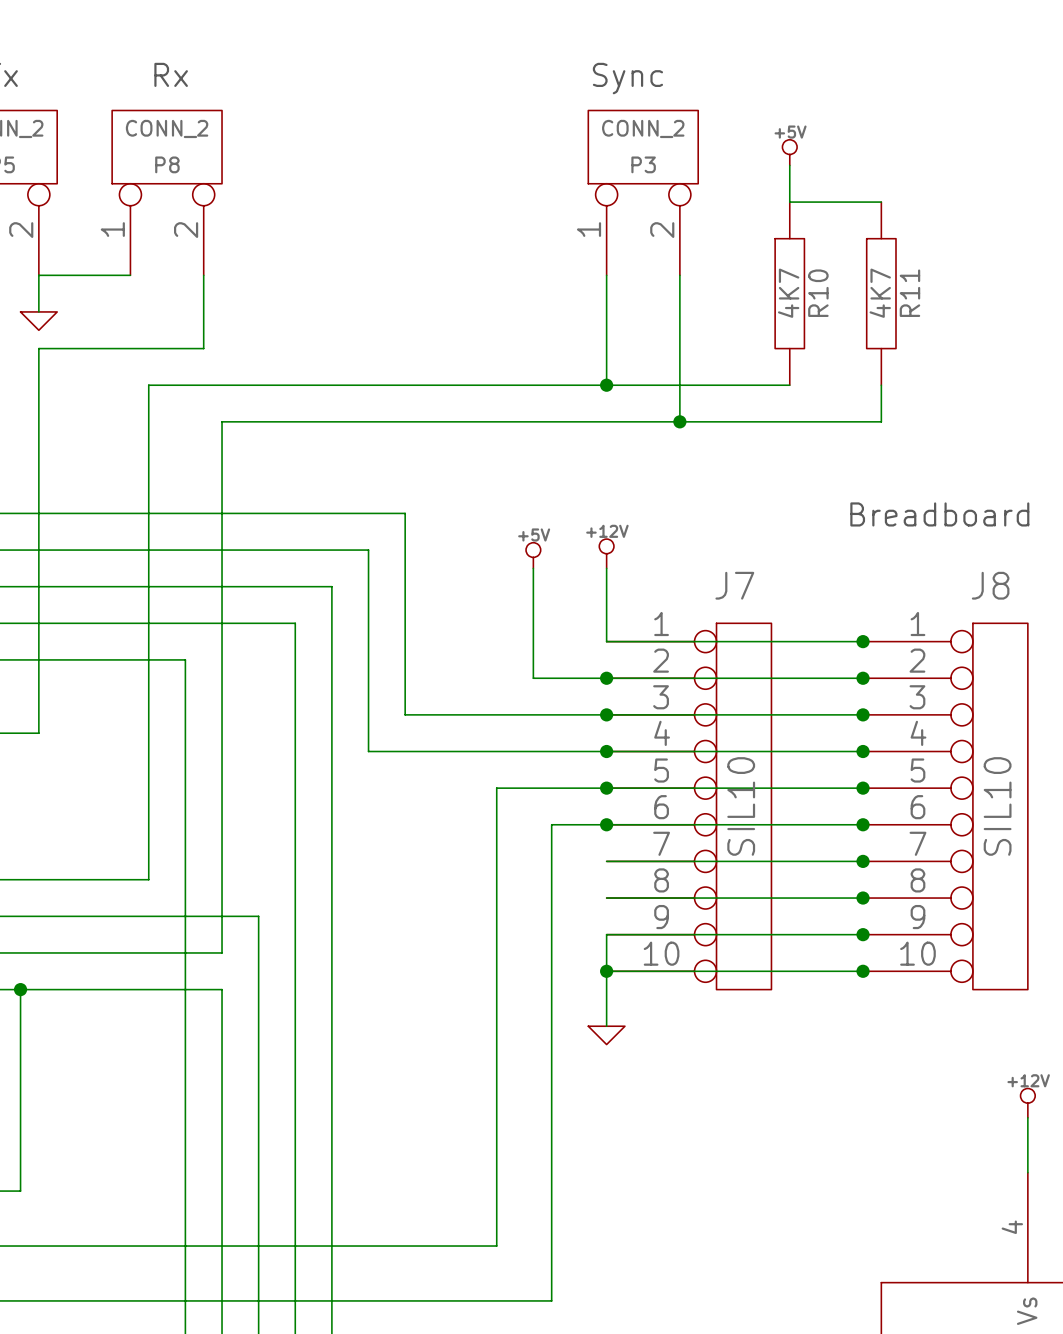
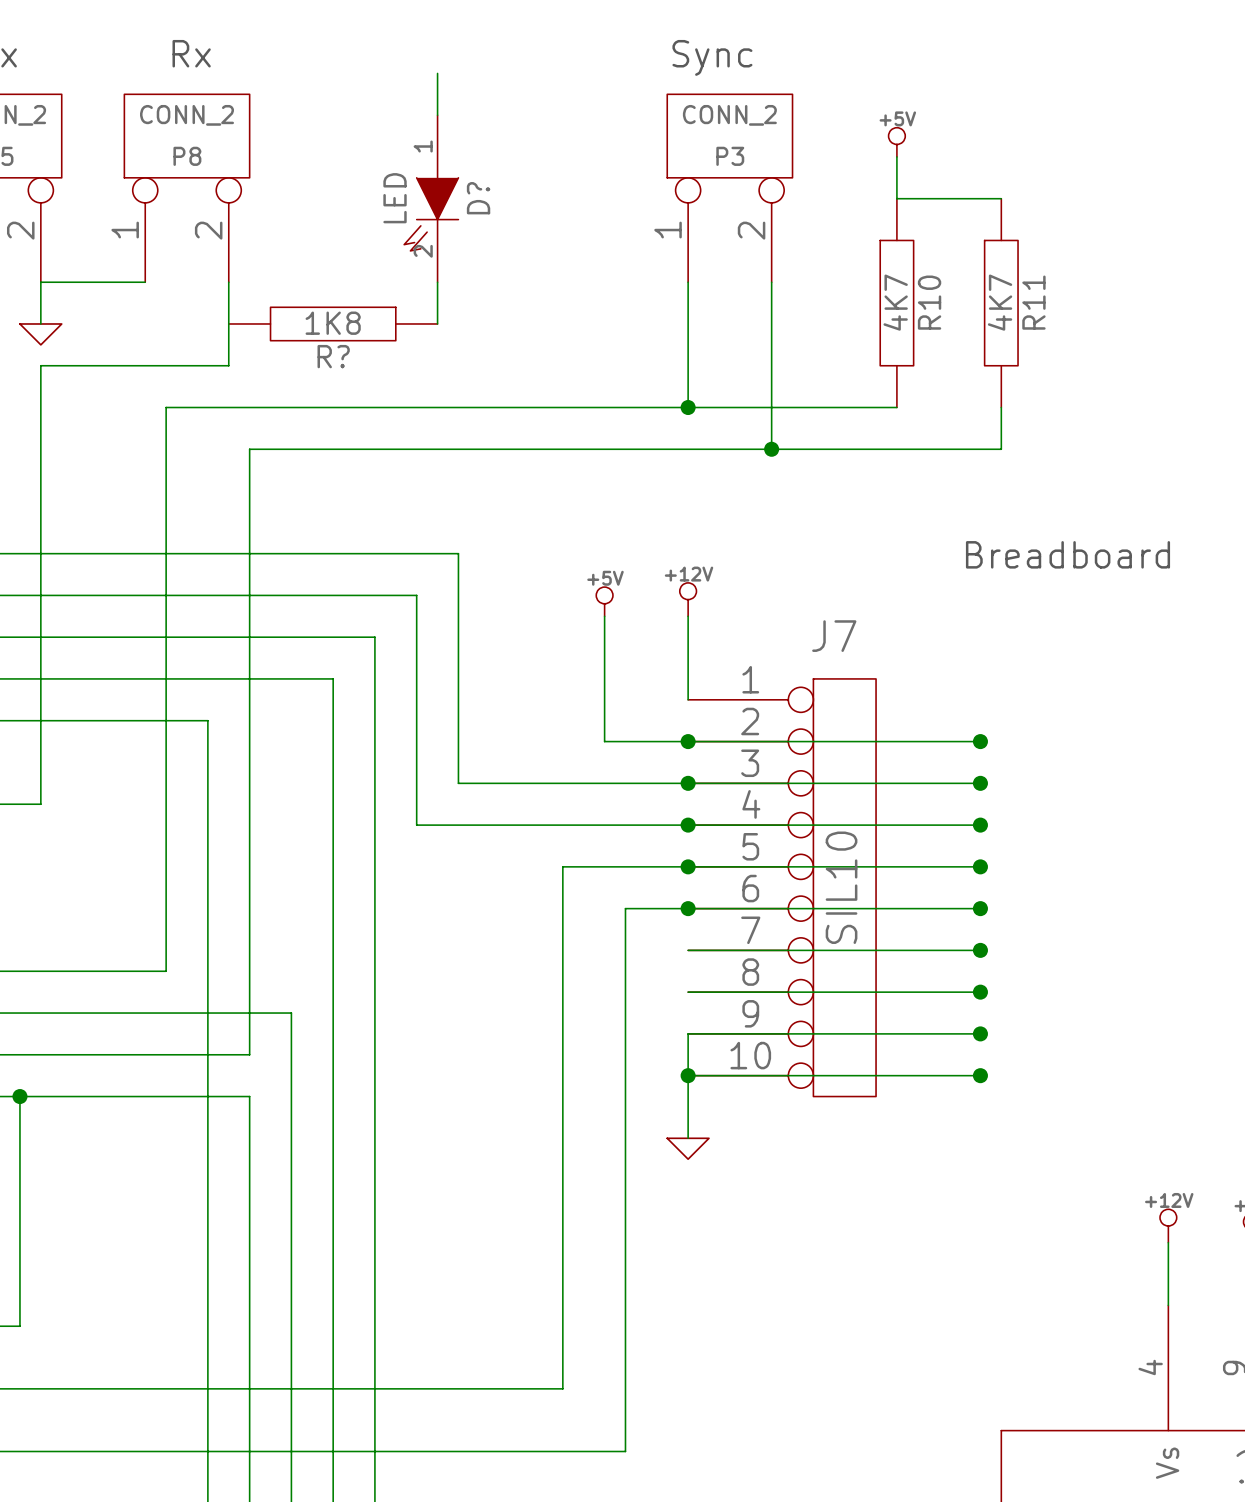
wire: none -> (437, 73) (437, 115)
D?: none -> LED (431, 198)
wire: none -> (437, 282) (437, 323)
R?: none -> 1K8 (333, 323)
wire: (606, 641) (863, 641) -> none
junction: (863, 641) -> none
J8: SIL10 (945, 806) -> none

